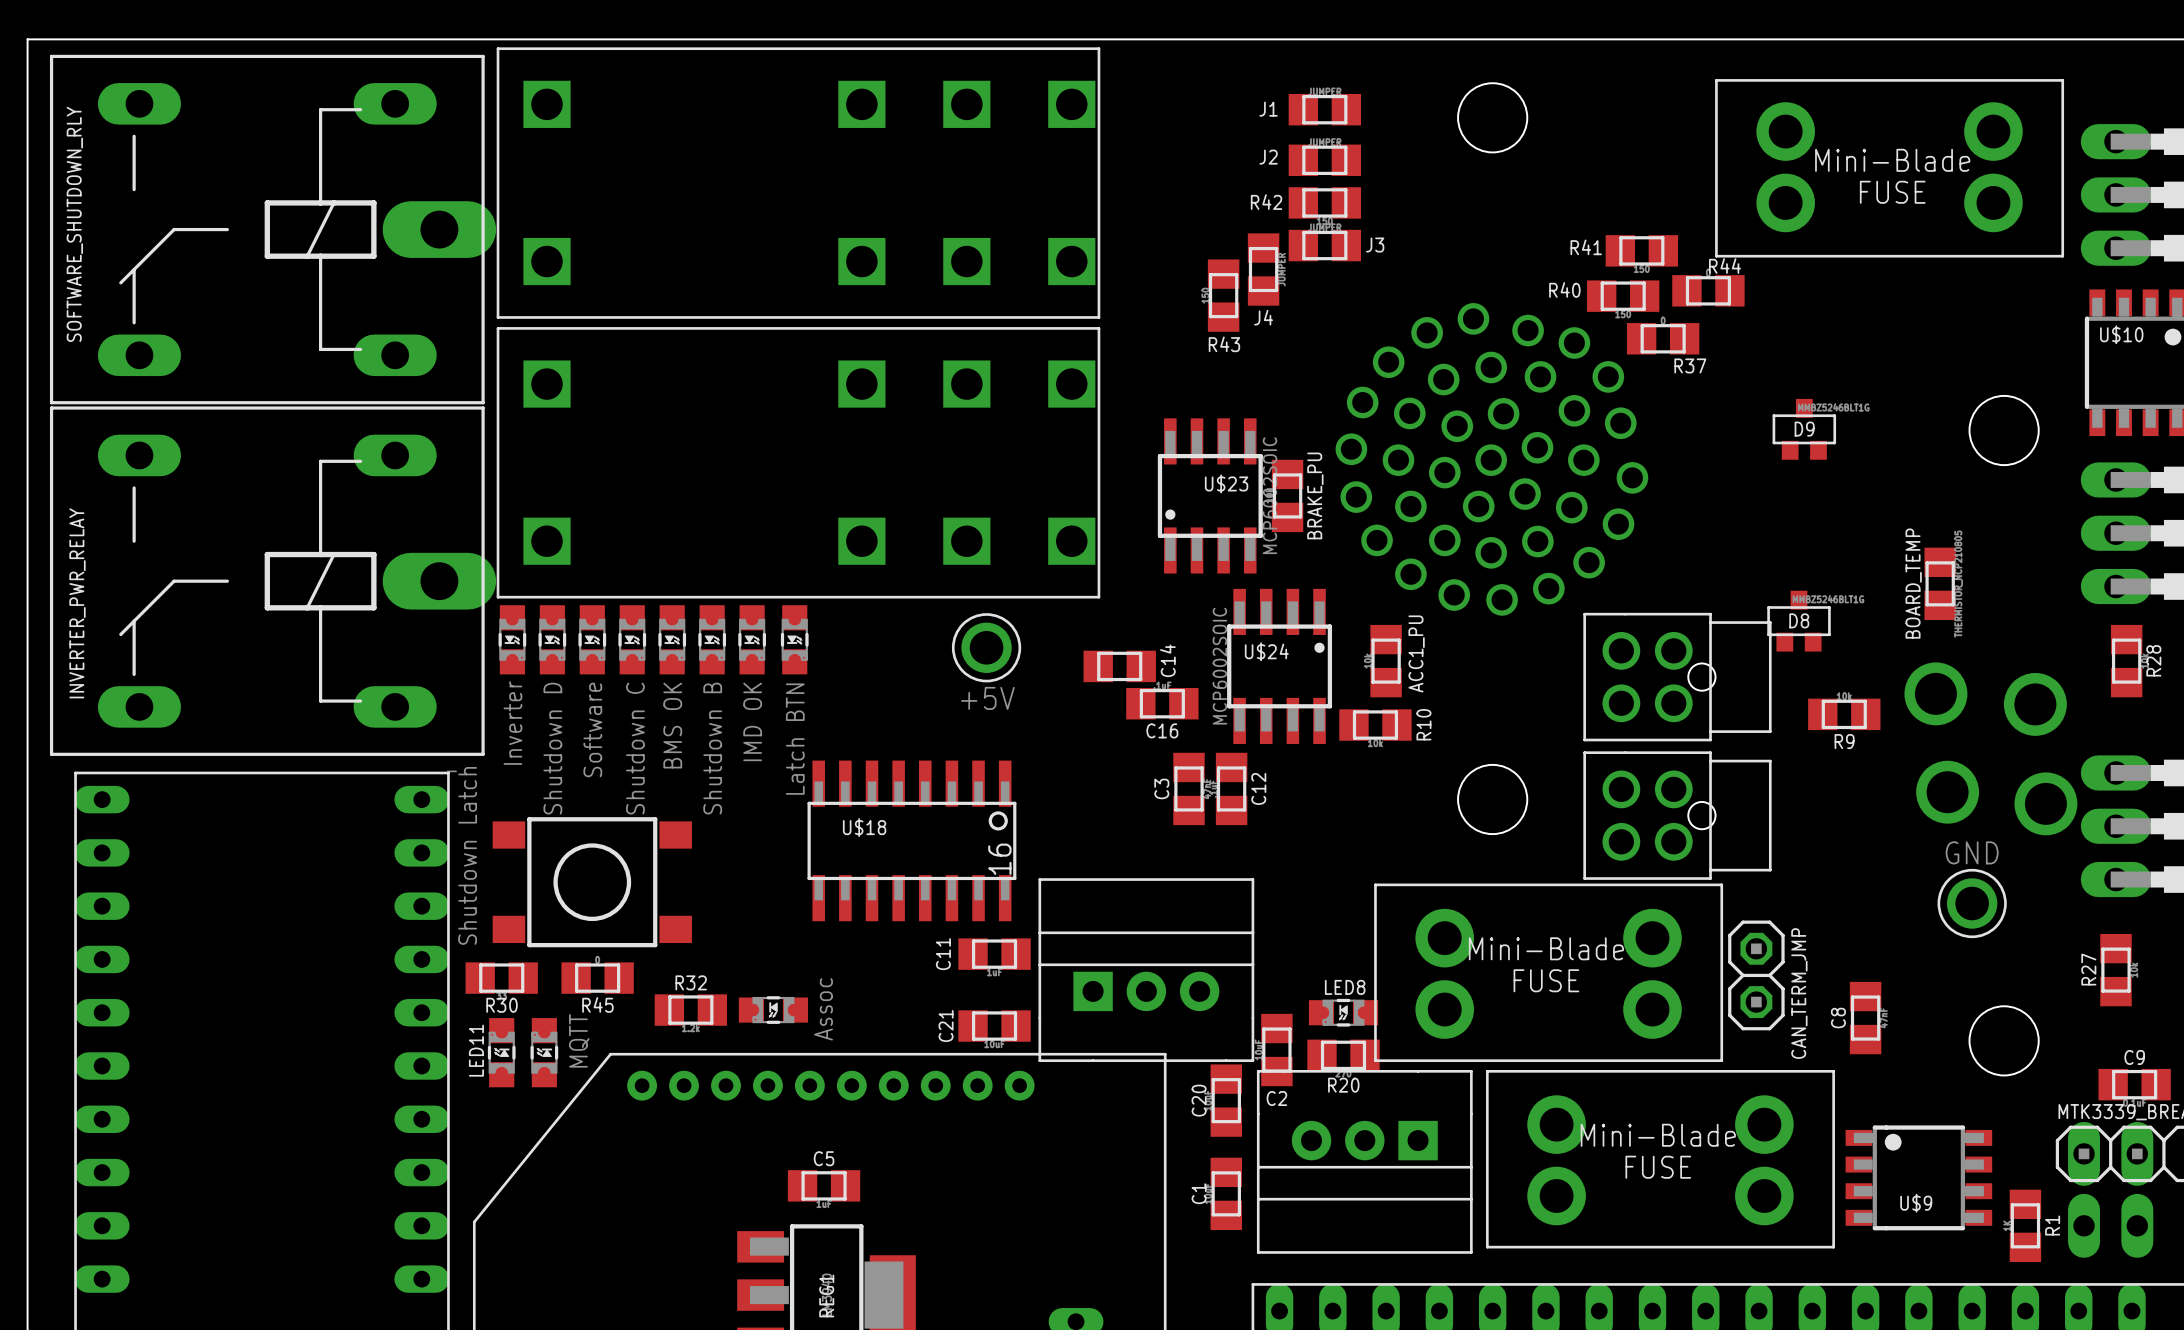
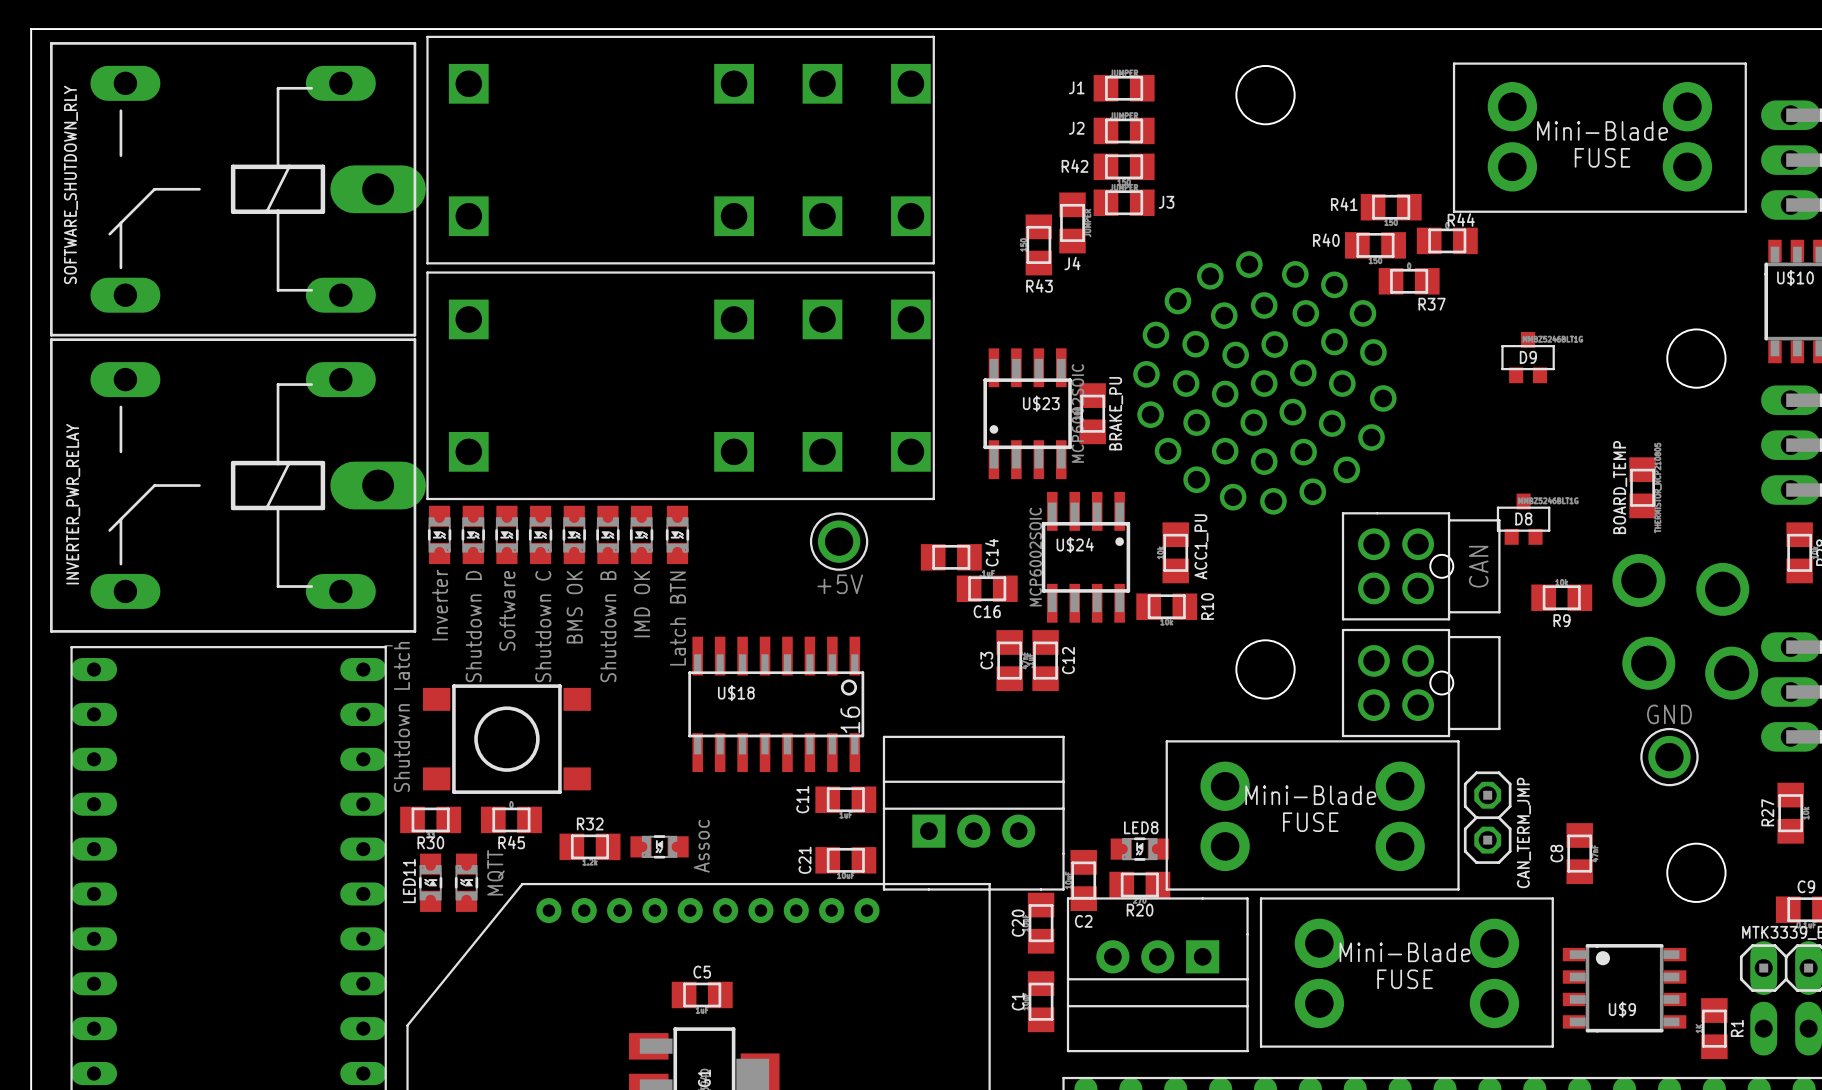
text: none -> CAN (1478, 566)

